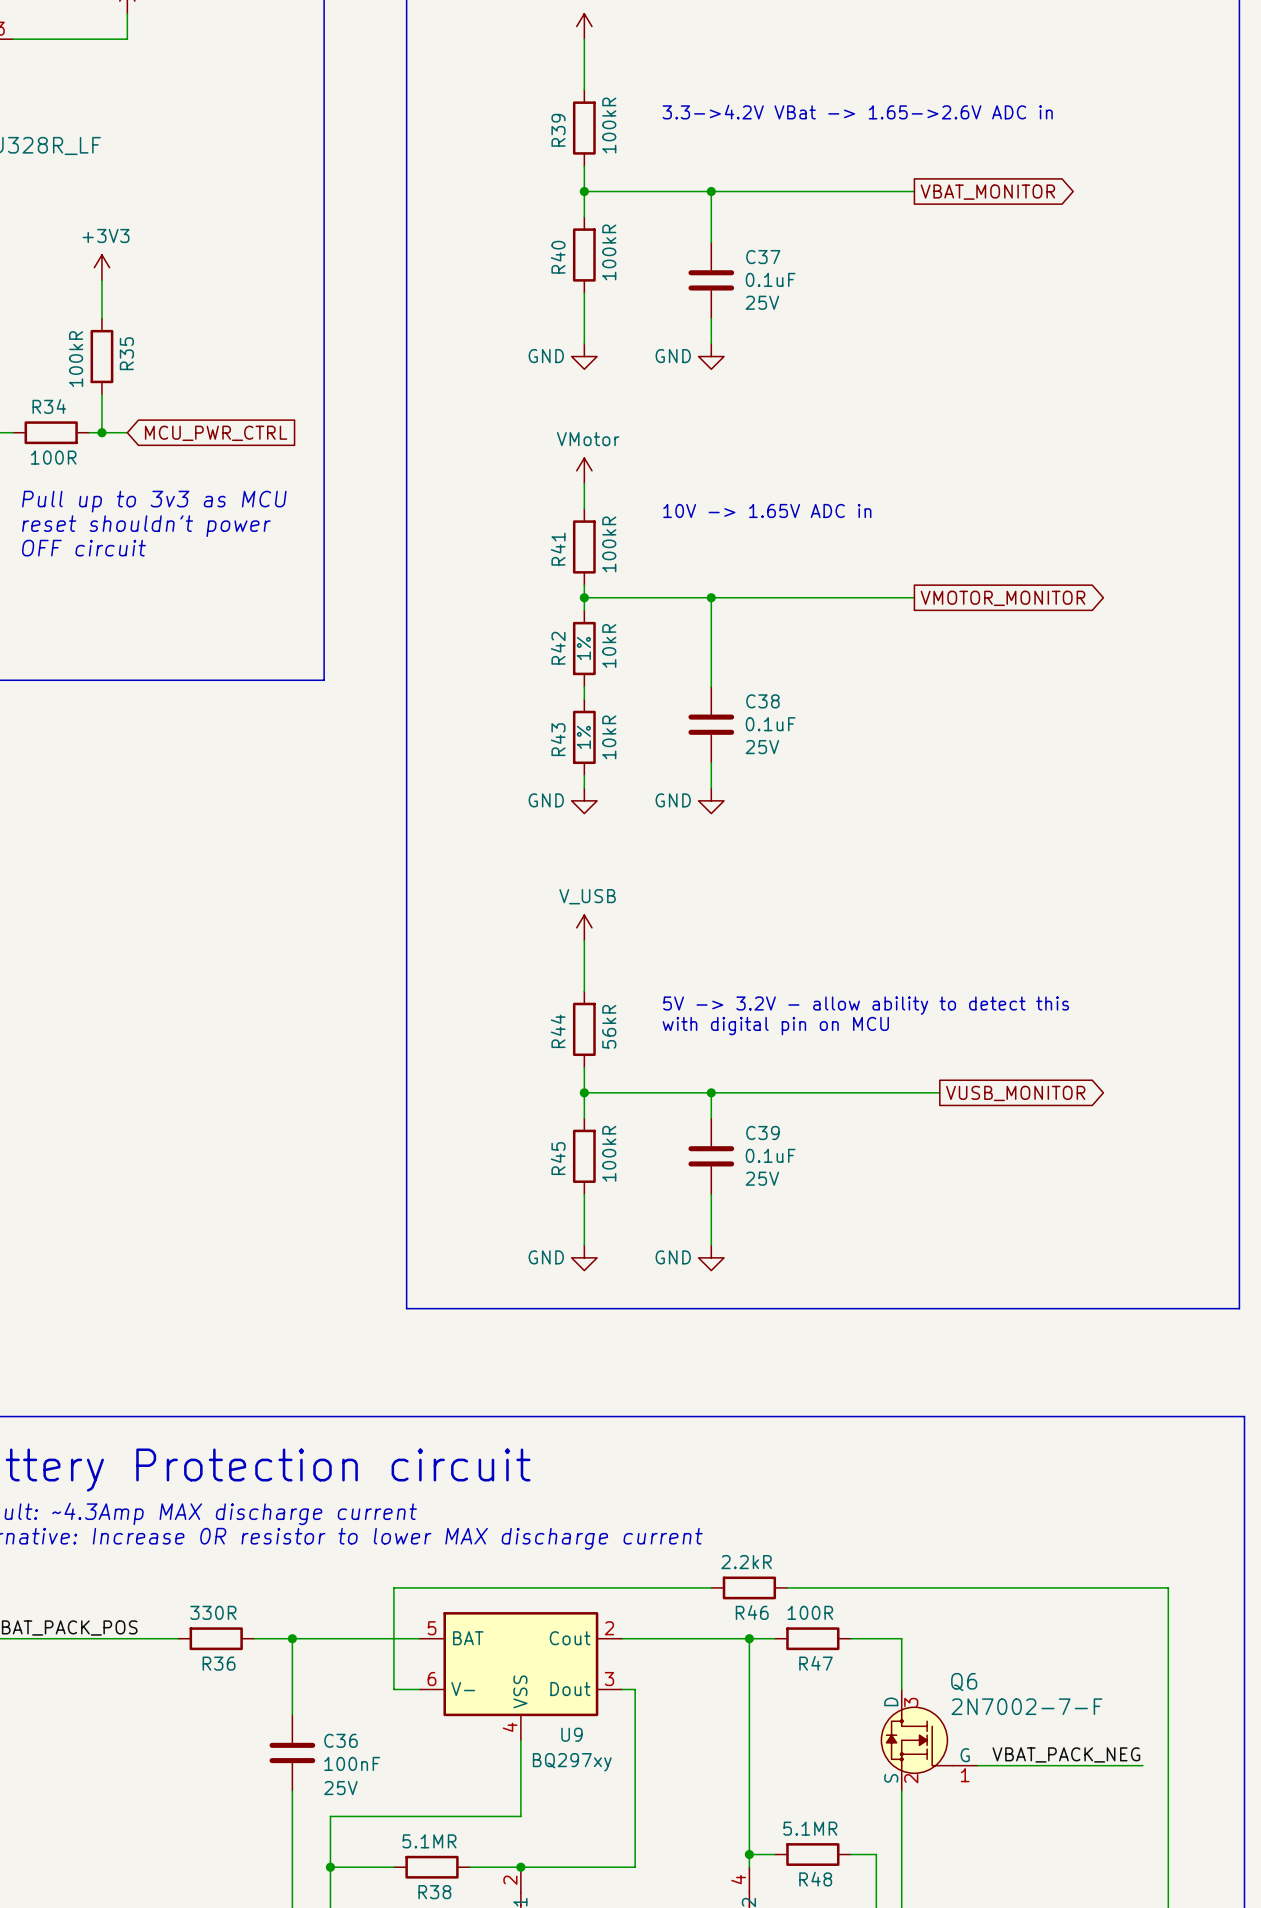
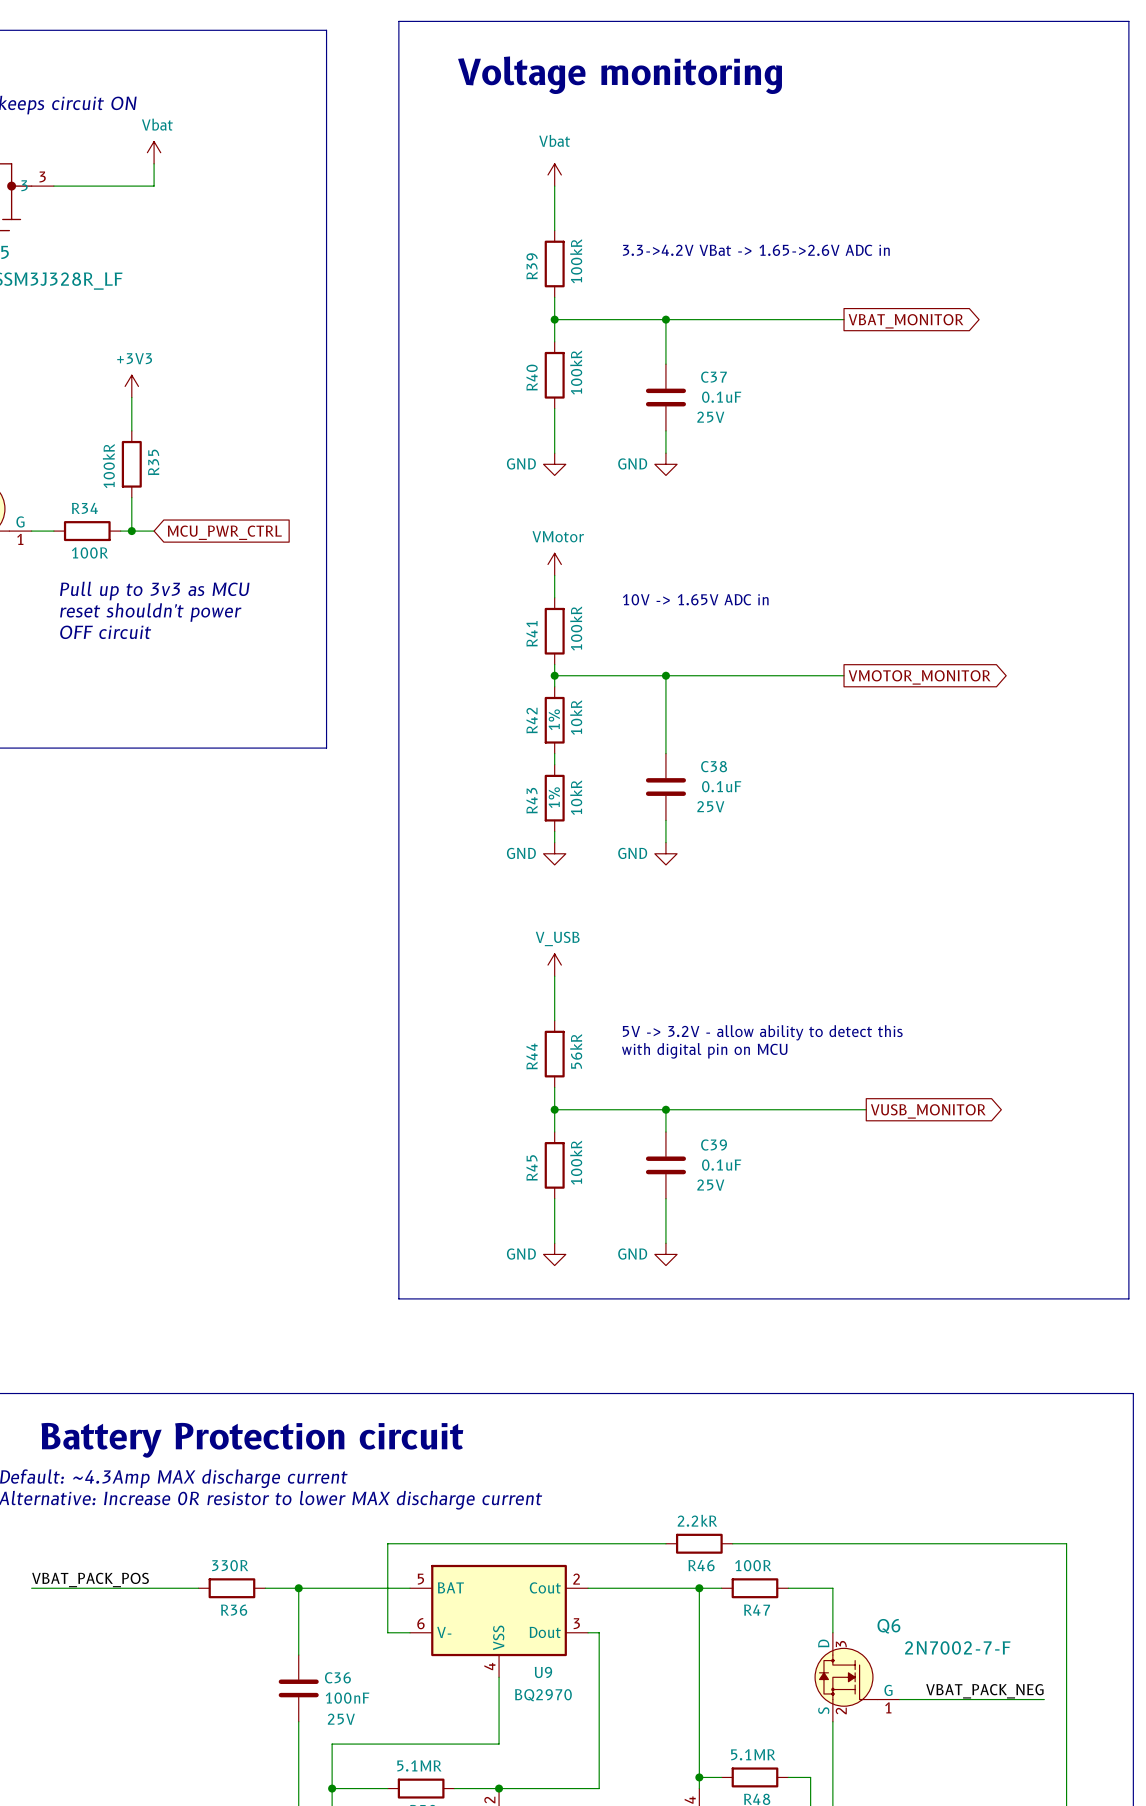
U9 value: BQ297xy (572, 1762) -> BQ2970 (543, 1695)

